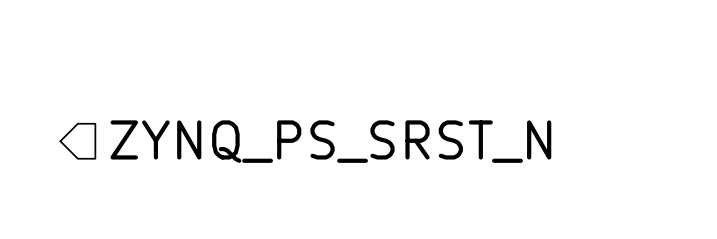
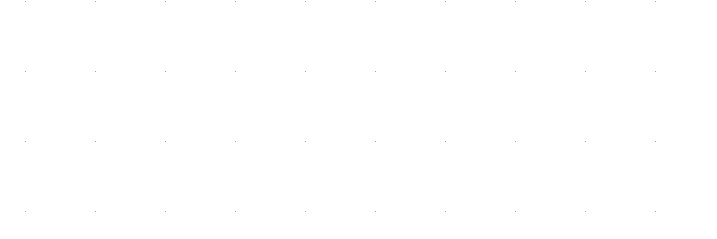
hierarchical label: ZYNQ_PS_SRST_N (330, 141) -> none

